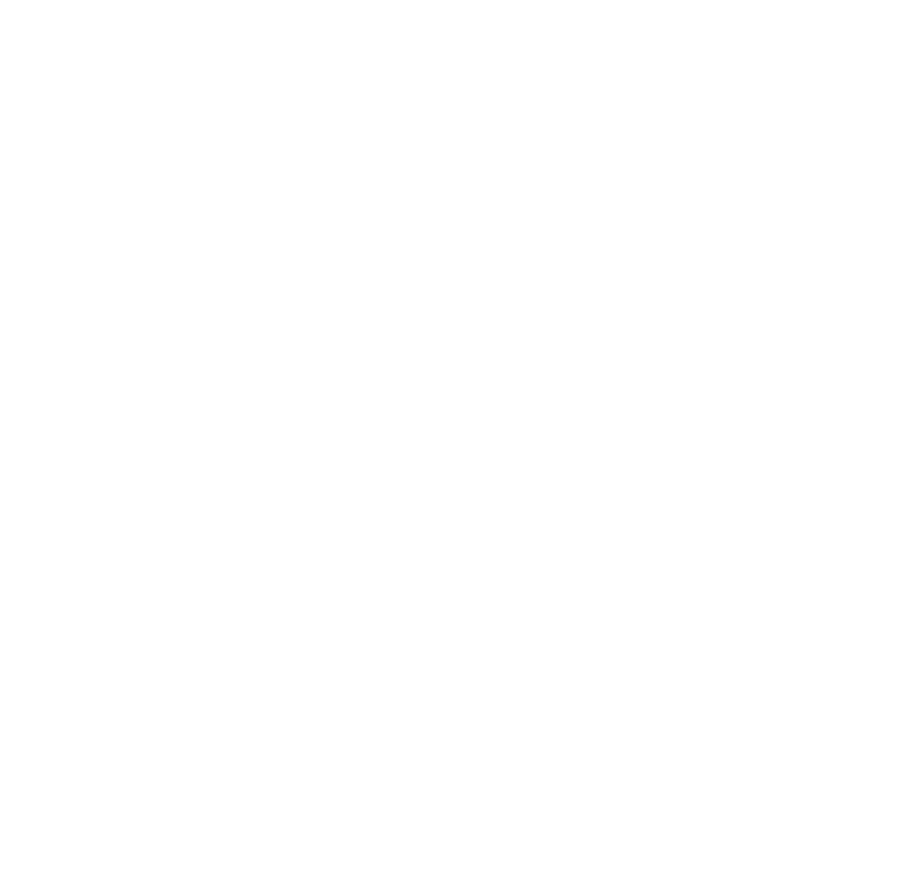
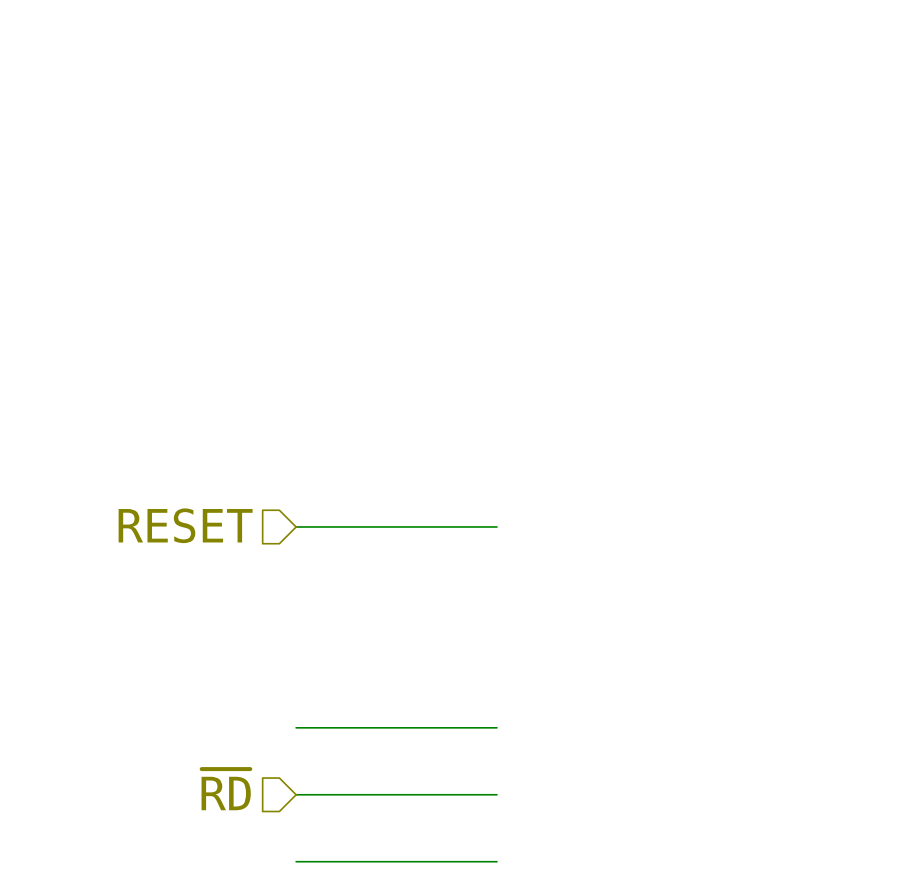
hierarchical label: none -> RESET (185, 525)
wire: none -> (296, 526) (496, 526)
wire: none -> (296, 727) (496, 727)
hierarchical label: none -> ~{RD} (226, 789)
wire: none -> (296, 794) (496, 794)
wire: none -> (296, 861) (496, 861)

